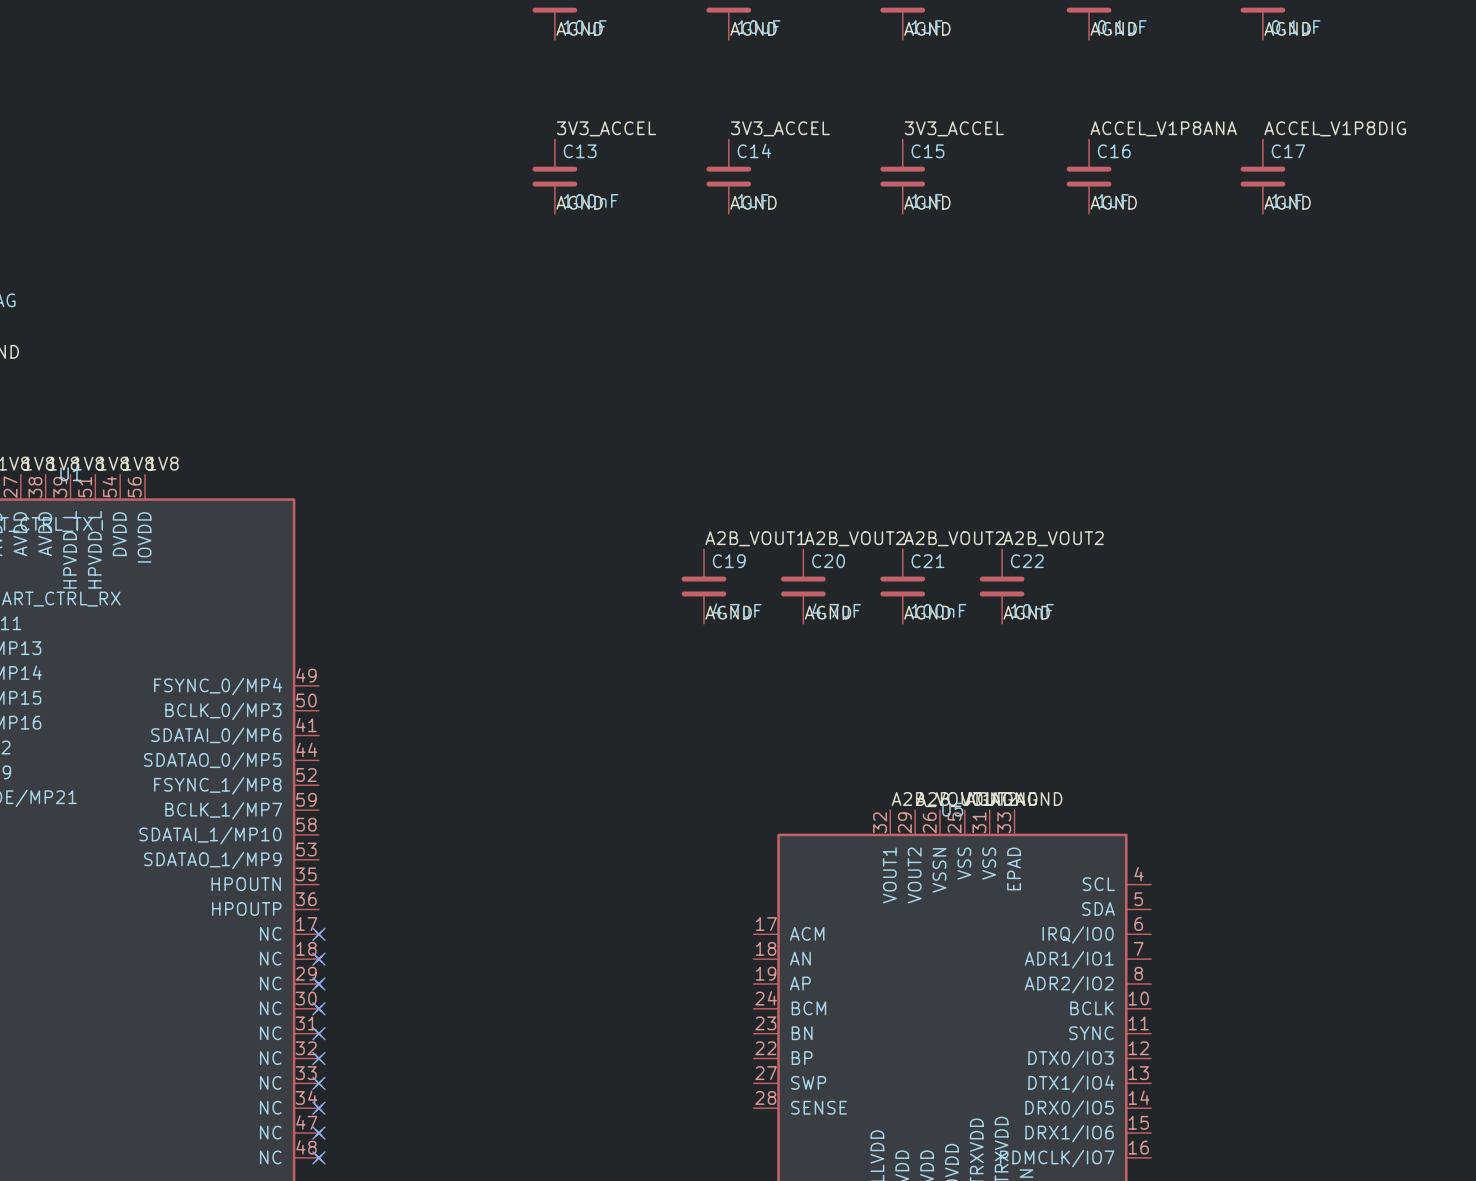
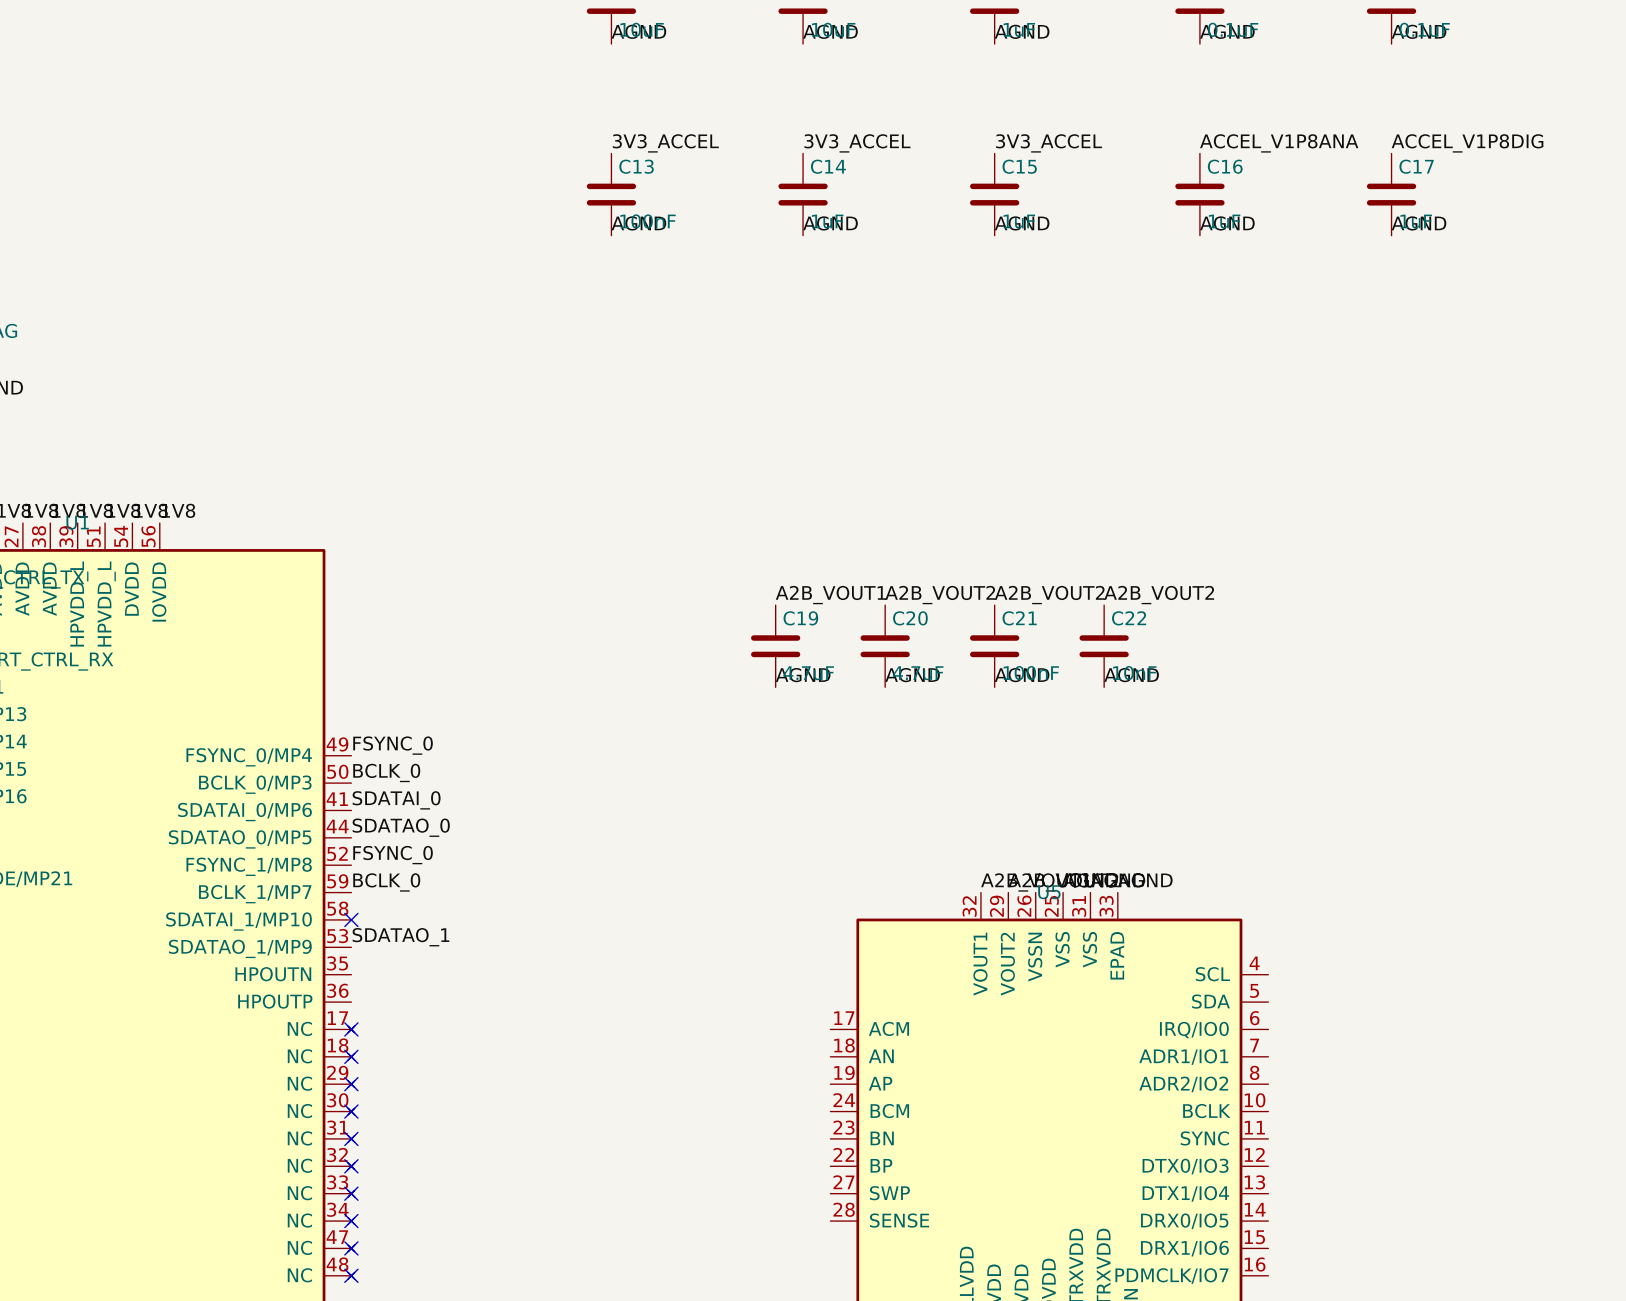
label: none -> FSYNC_0 (393, 745)
label: none -> BCLK_0 (386, 772)
label: none -> SDATAI_0 (396, 800)
label: none -> SDATAO_0 (401, 827)
label: none -> FSYNC_0 (393, 855)
label: none -> BCLK_0 (386, 882)
no-connect mark: none -> (351, 919)
label: none -> SDATAO_1 (400, 937)

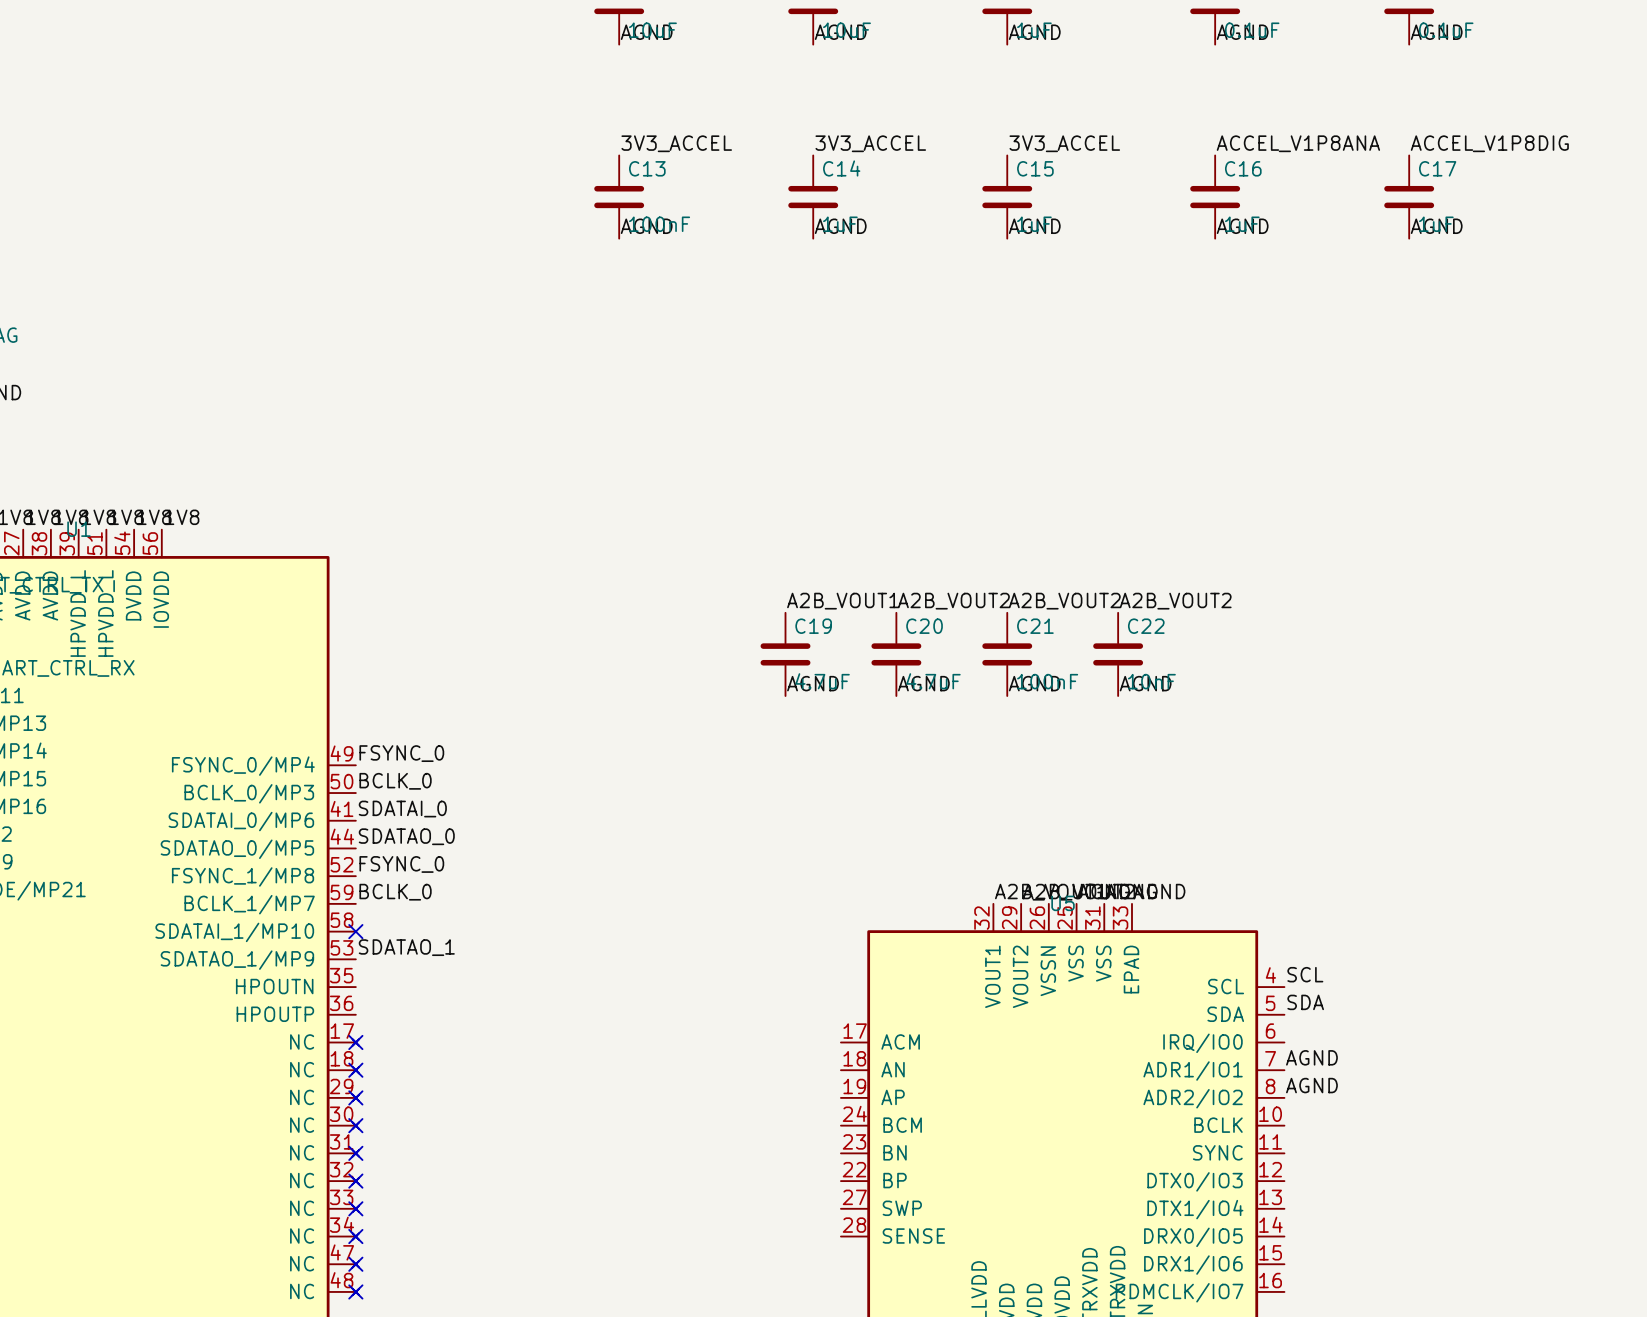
label: none -> SCL (1305, 974)
label: none -> SDA (1305, 1002)
label: none -> AGND (1311, 1057)
label: none -> AGND (1311, 1085)

